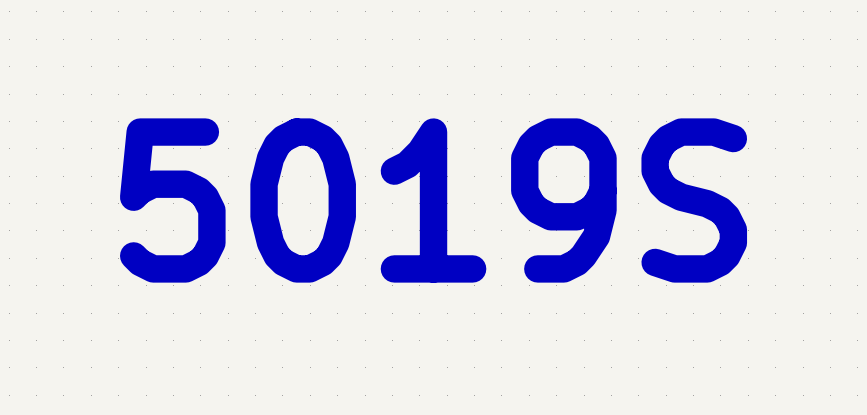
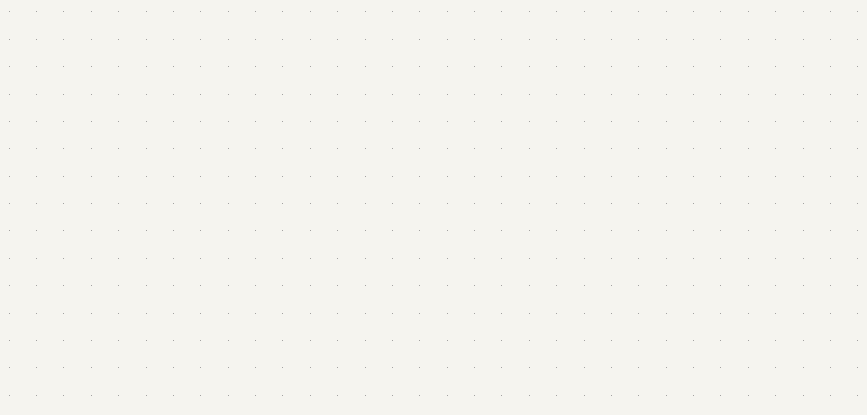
text: 5019S (433, 200) -> none

